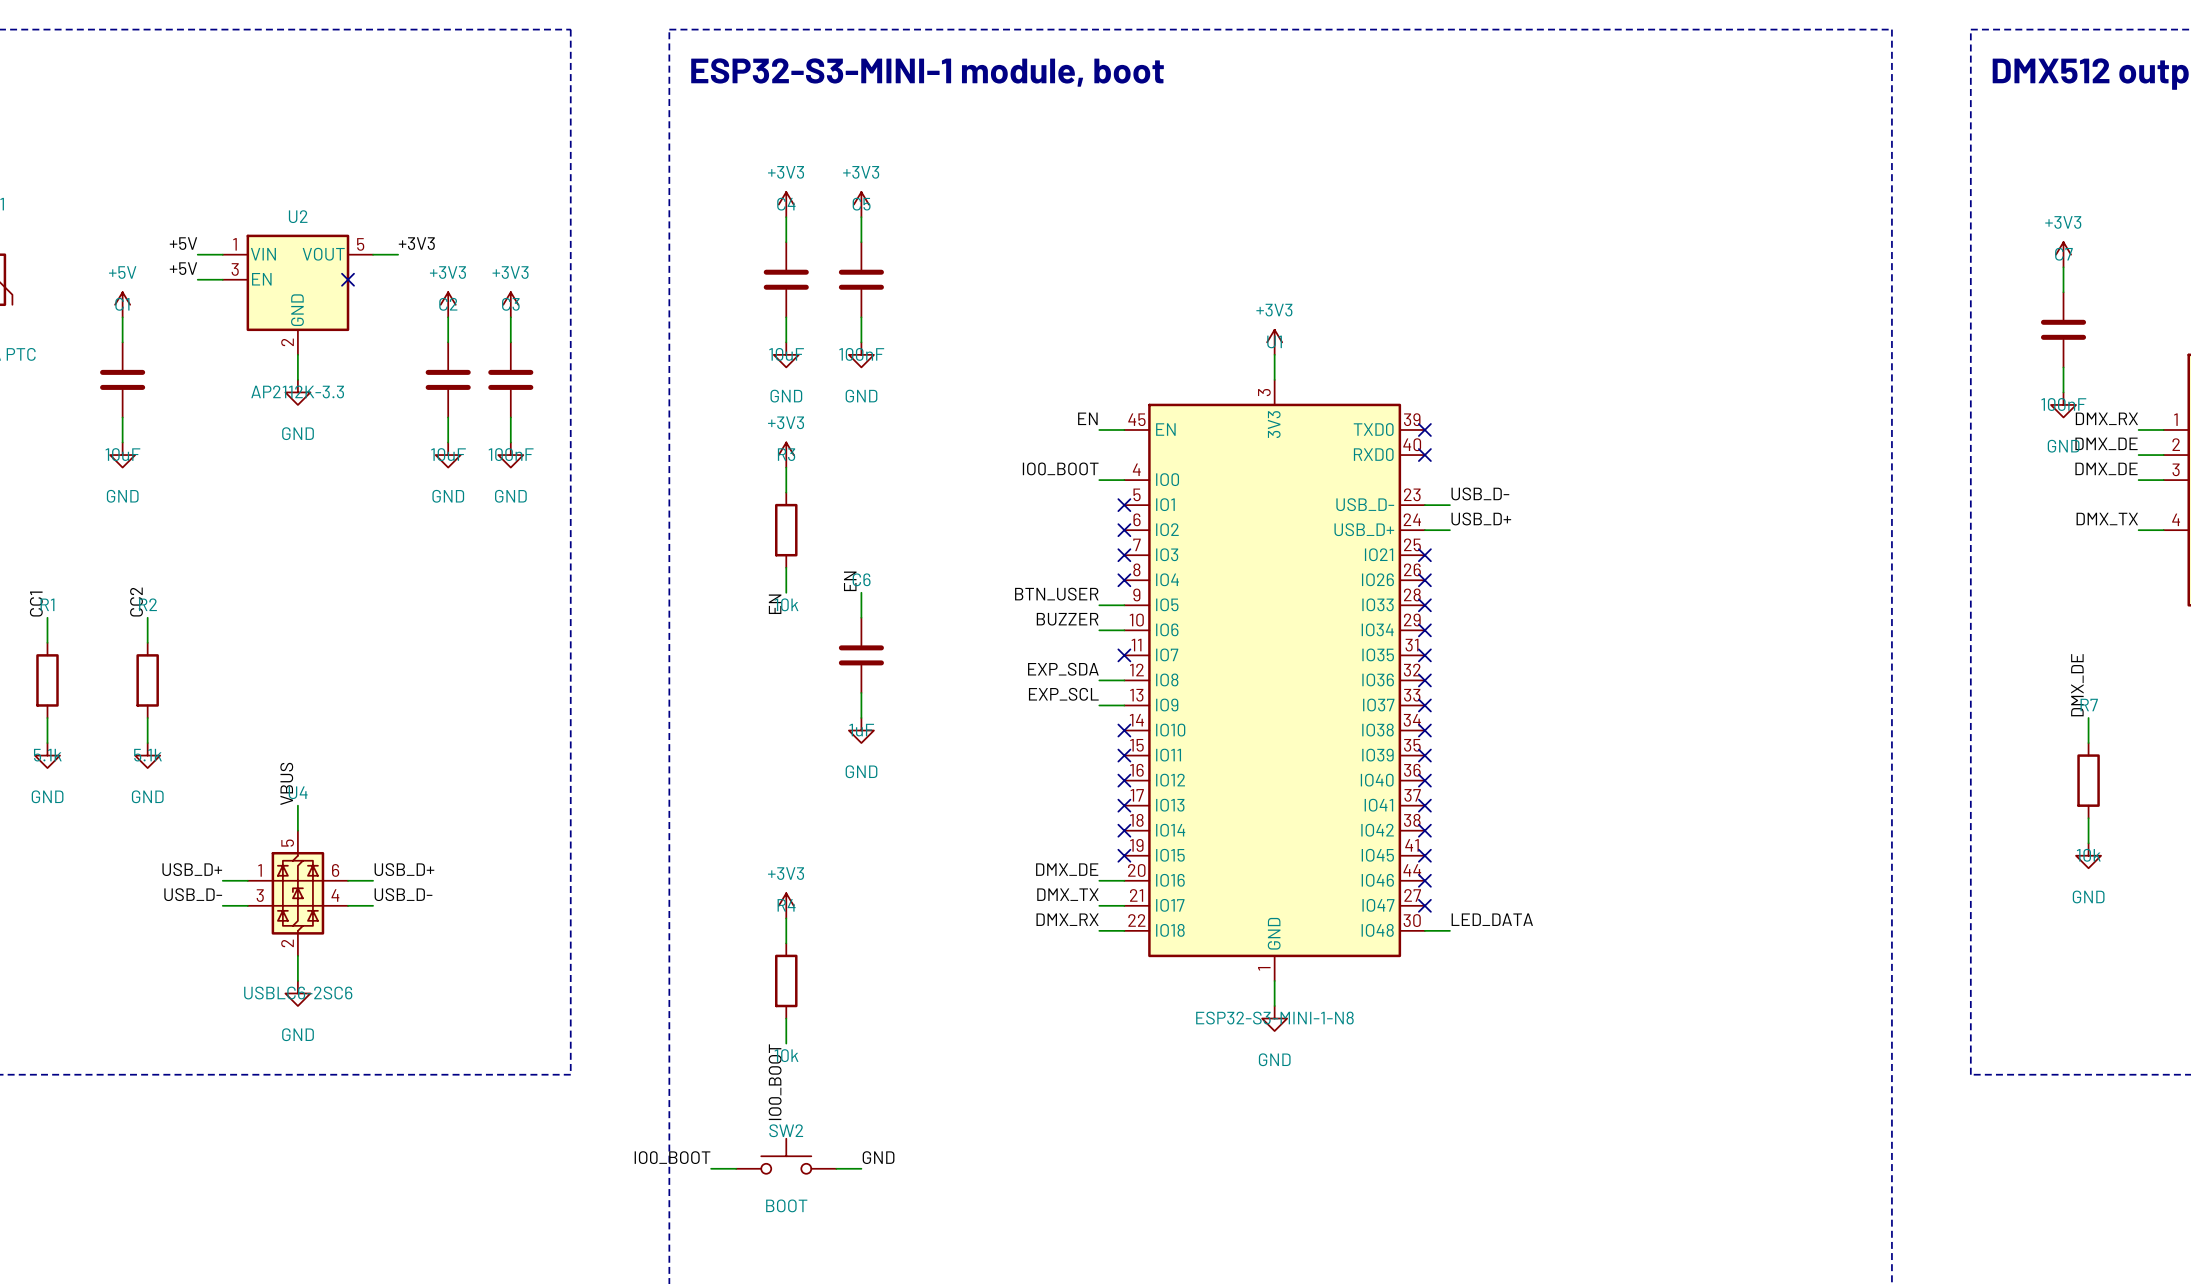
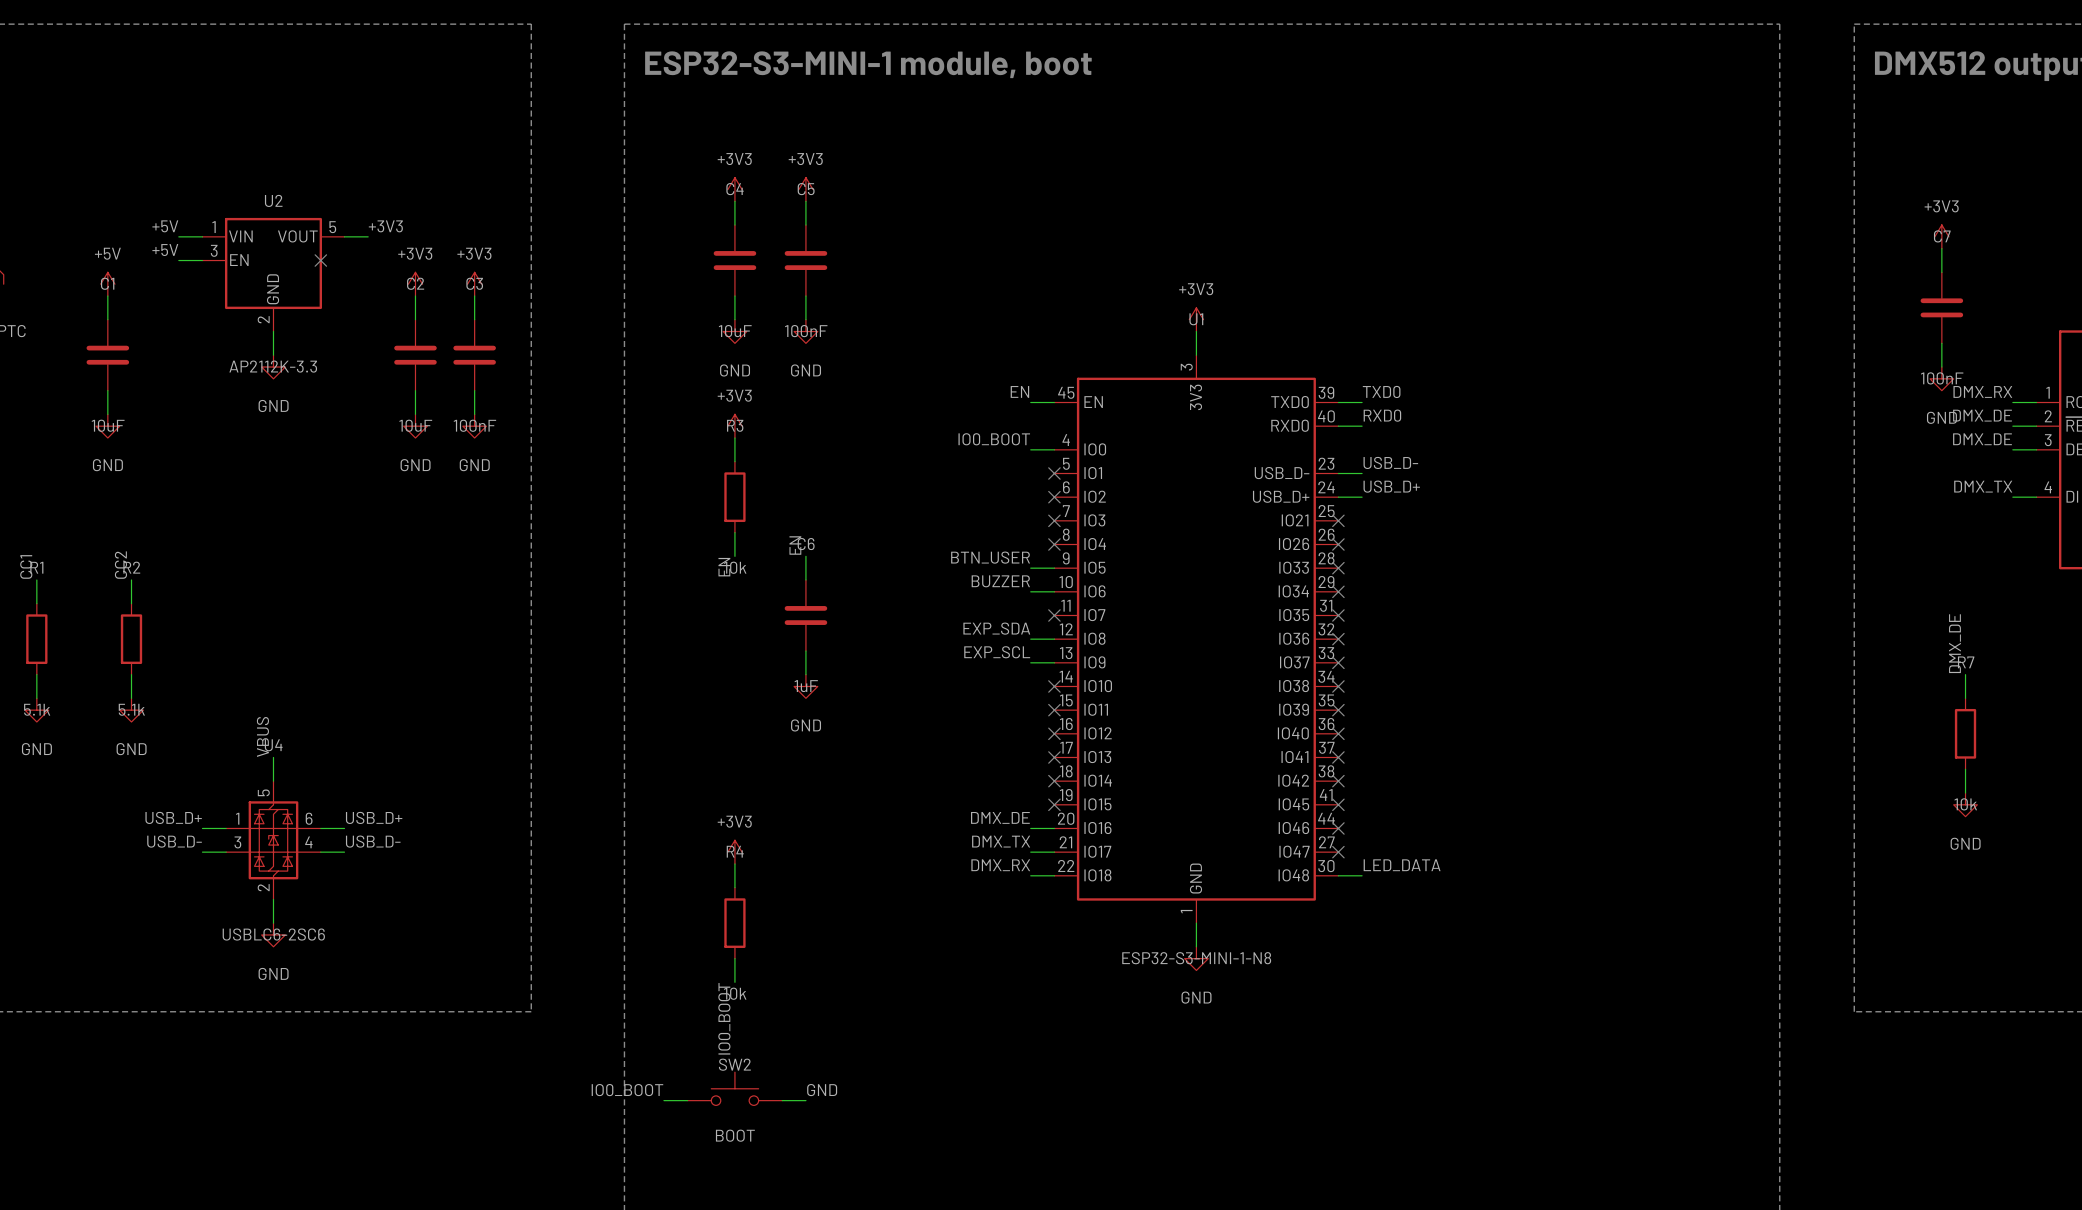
label: none -> TXD0 (1381, 391)
wire: none -> (1338, 402) (1362, 402)
no-connect mark: (1424, 429) -> none
label: none -> RXD0 (1382, 415)
wire: none -> (1338, 426) (1362, 426)
no-connect mark: (1424, 455) -> none

